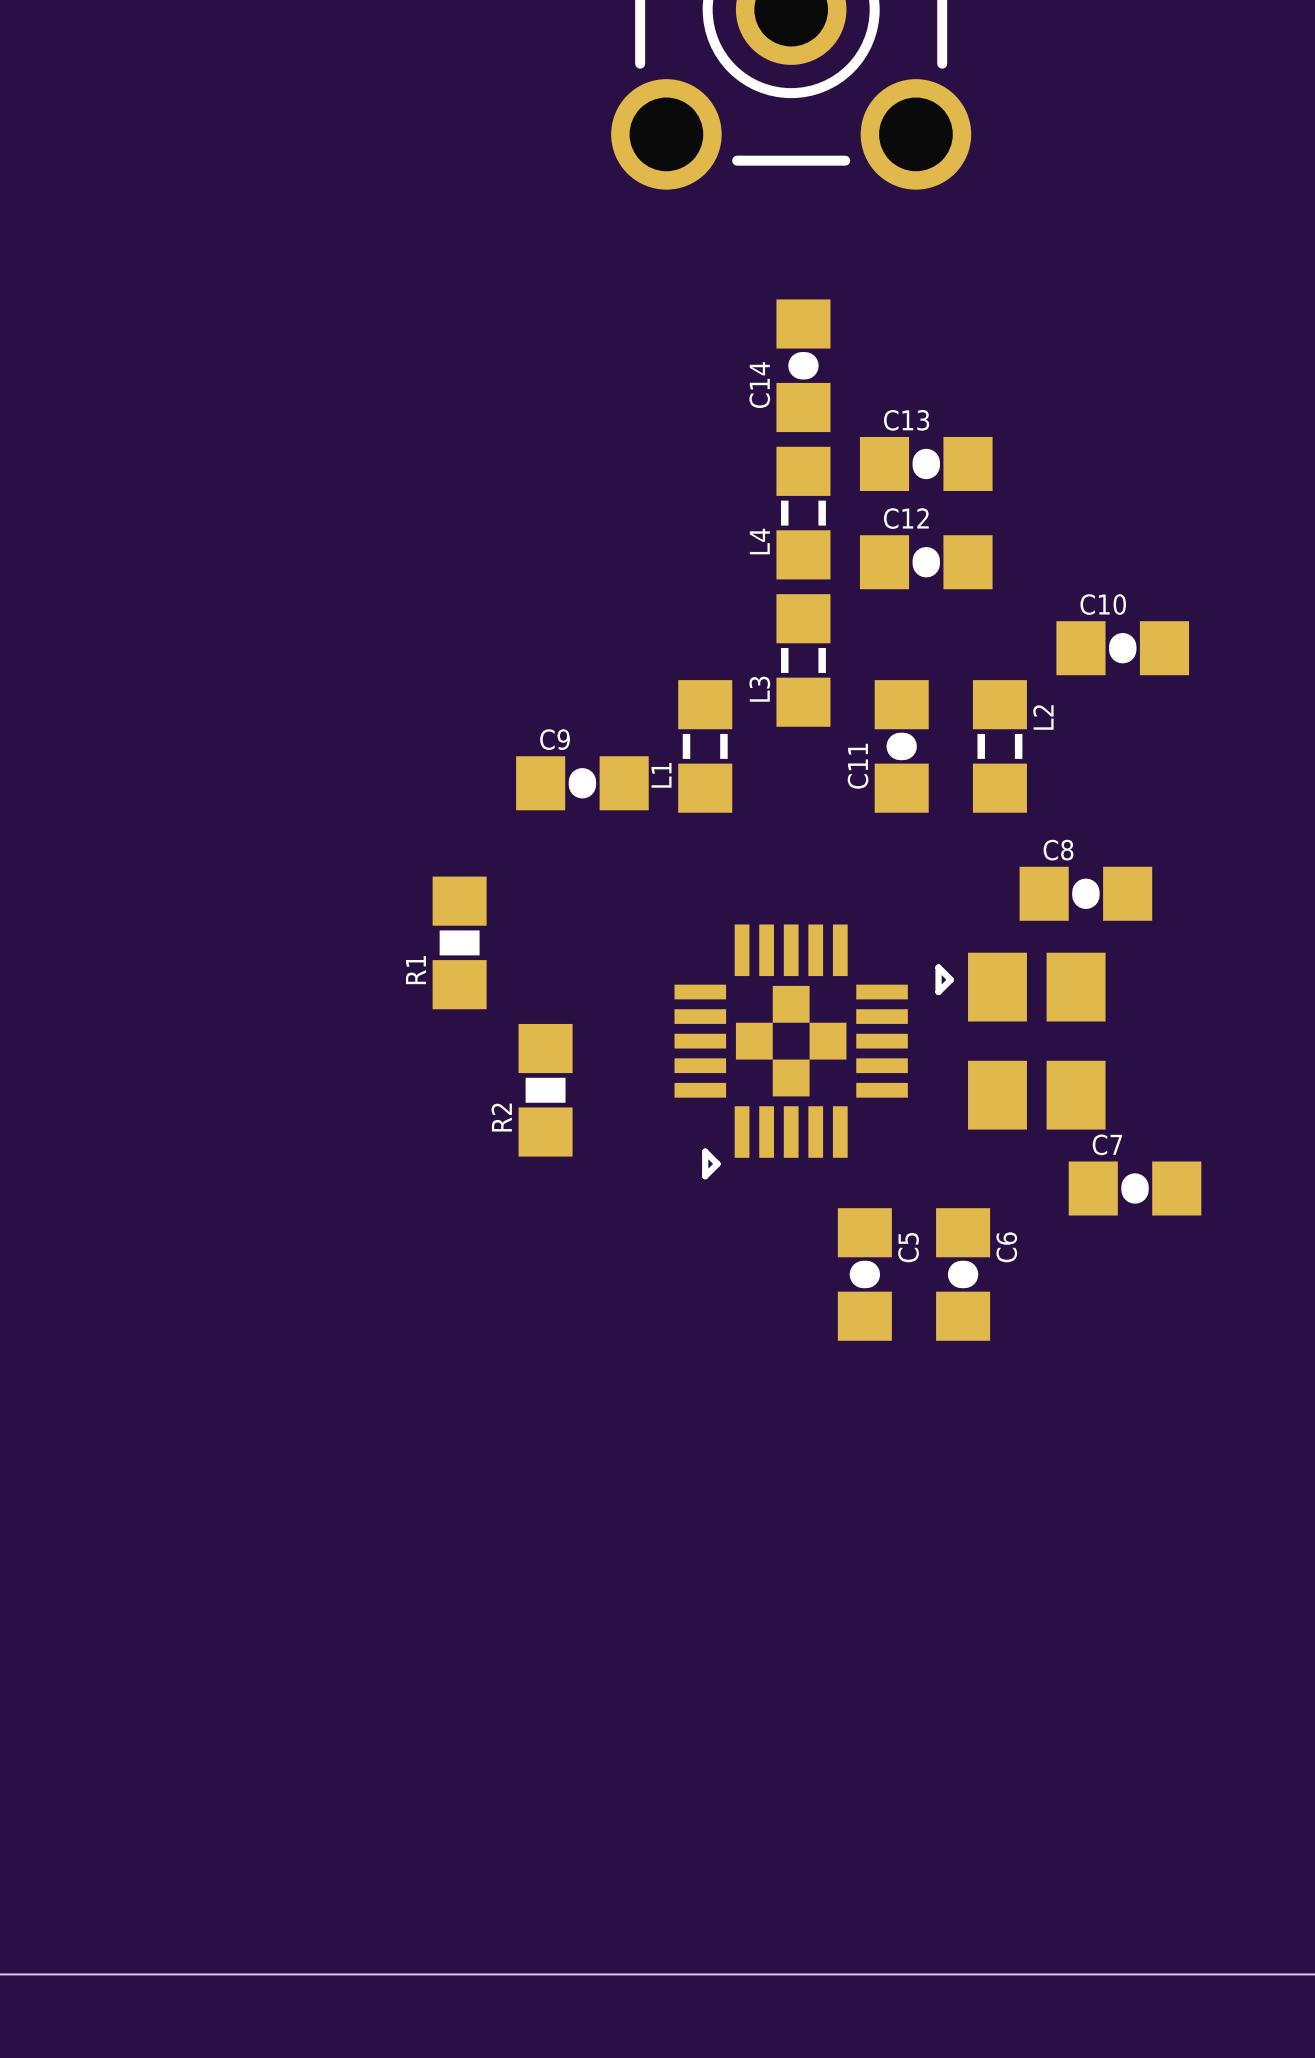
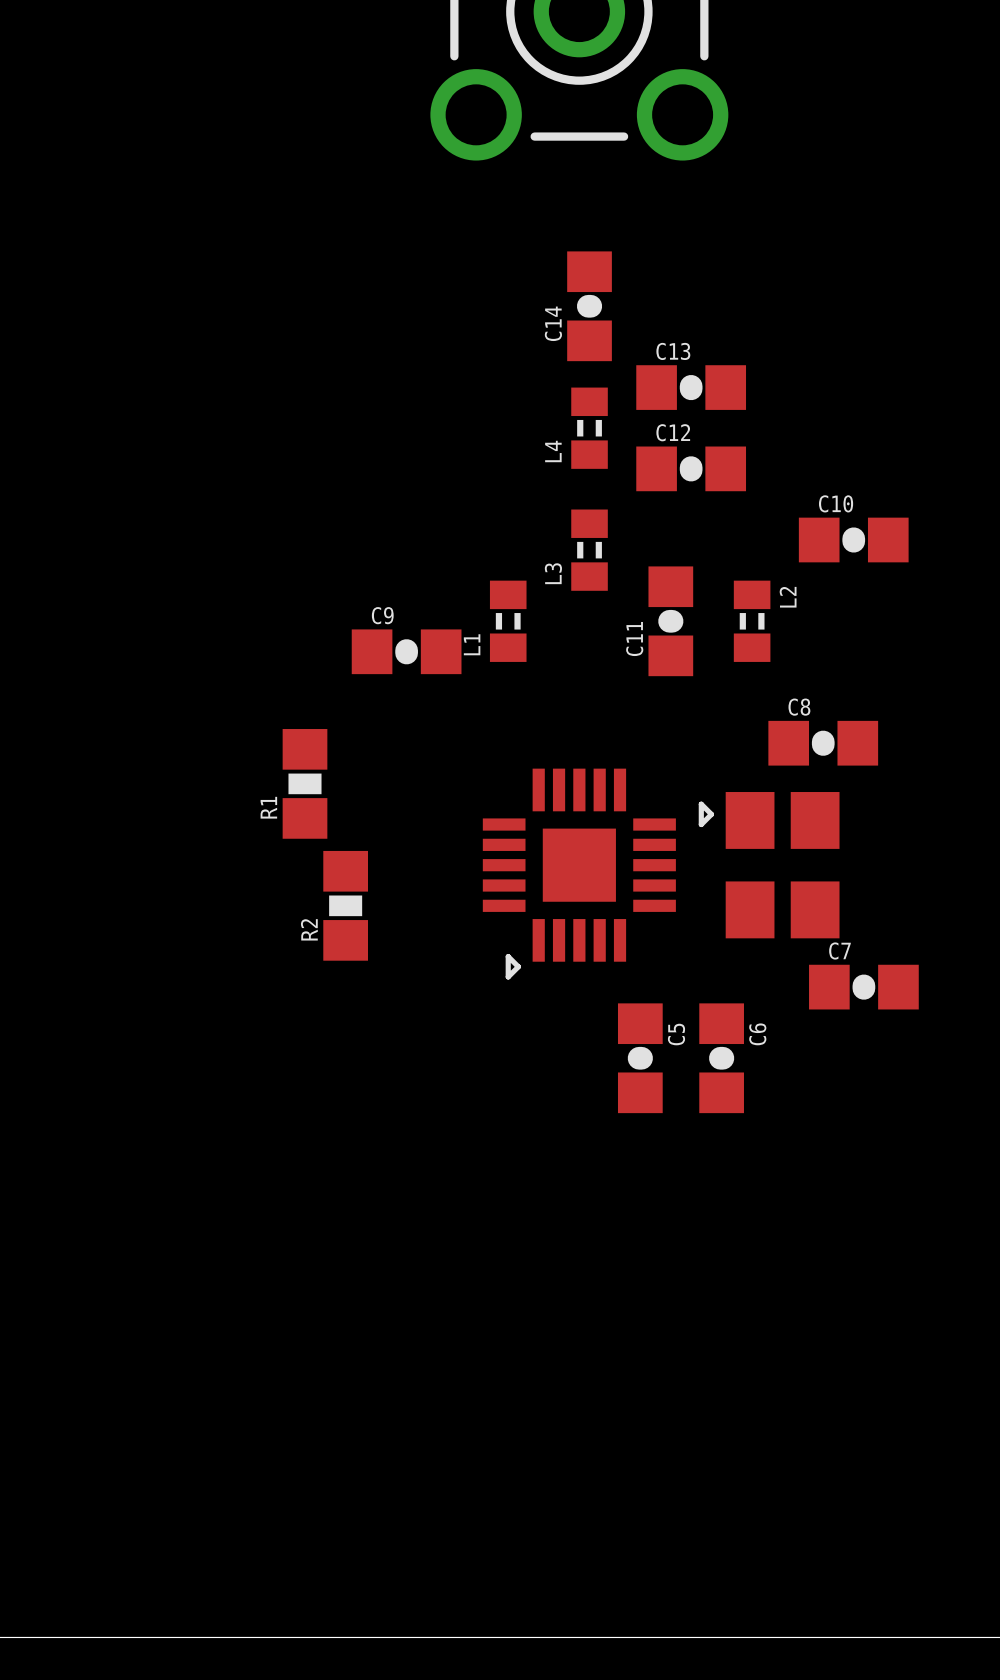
L4 footprint: [776, 446, 831, 580] -> [571, 387, 608, 469]
L3 footprint: [776, 594, 831, 727] -> [571, 509, 608, 591]
L1 footprint: [678, 680, 733, 813] -> [489, 580, 527, 662]
L2 footprint: [972, 680, 1027, 813] -> [733, 580, 771, 662]
part footprint: [674, 924, 908, 1180] -> [482, 768, 676, 980]
R2 position: (545, 1090) -> (345, 905)

